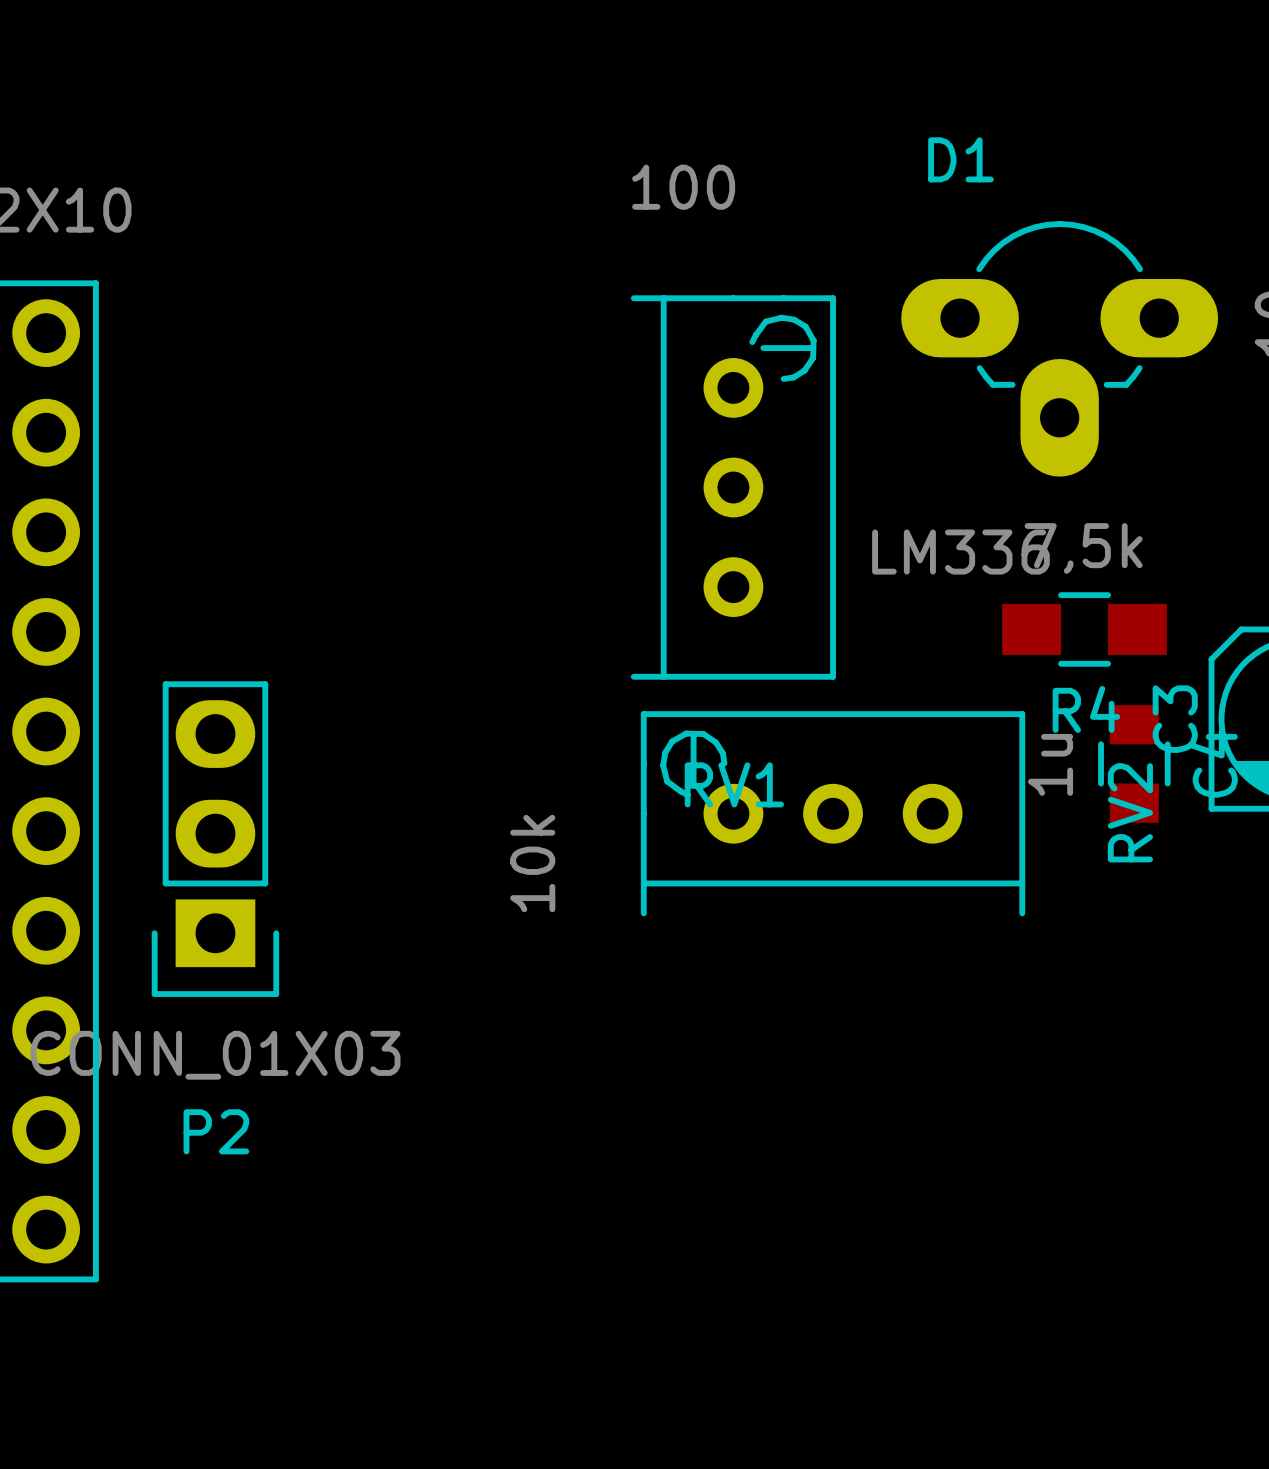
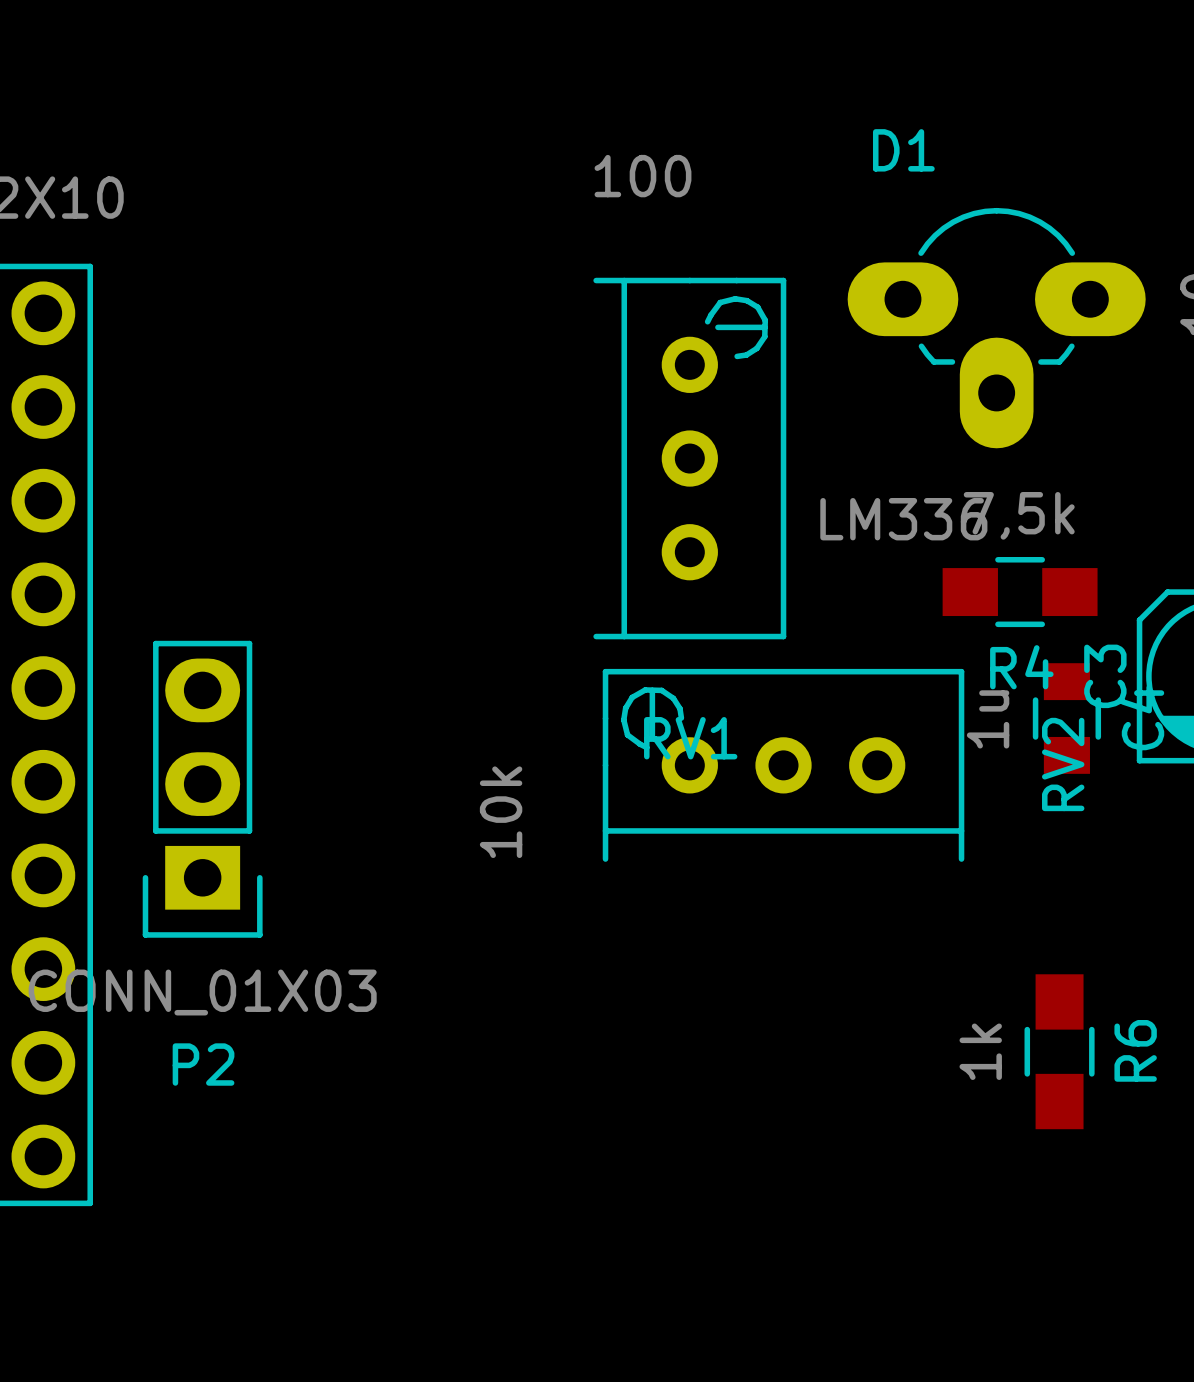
R6: none -> 1k (1059, 1051)

